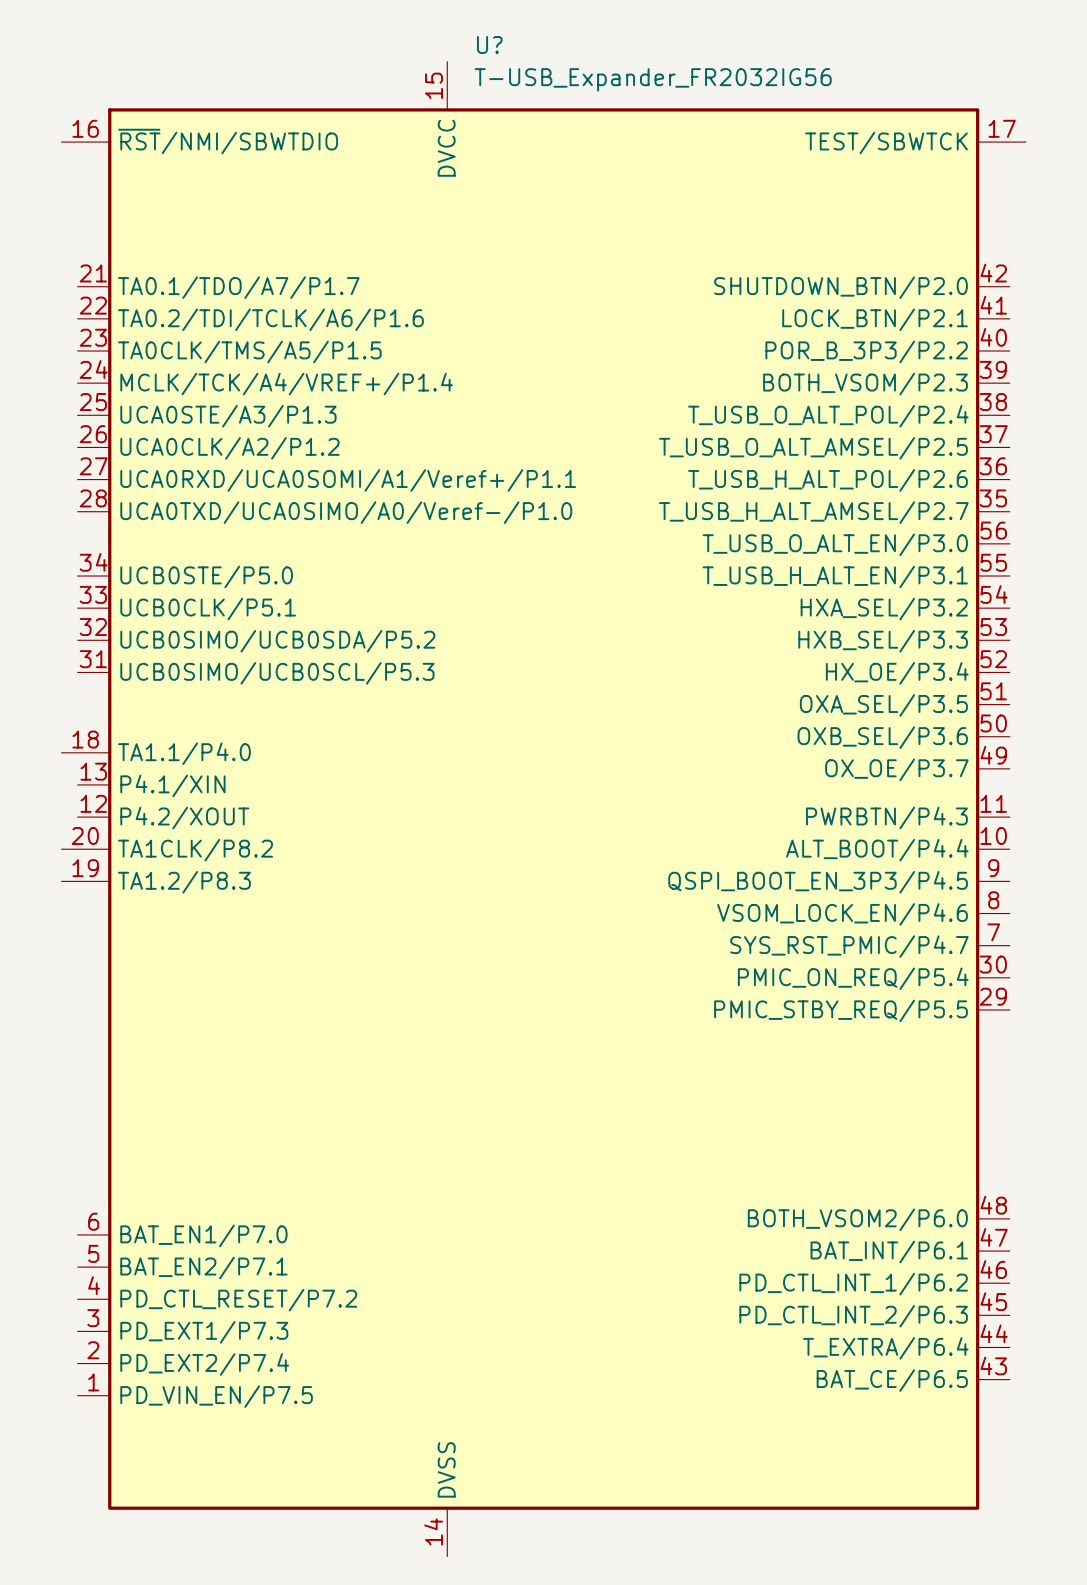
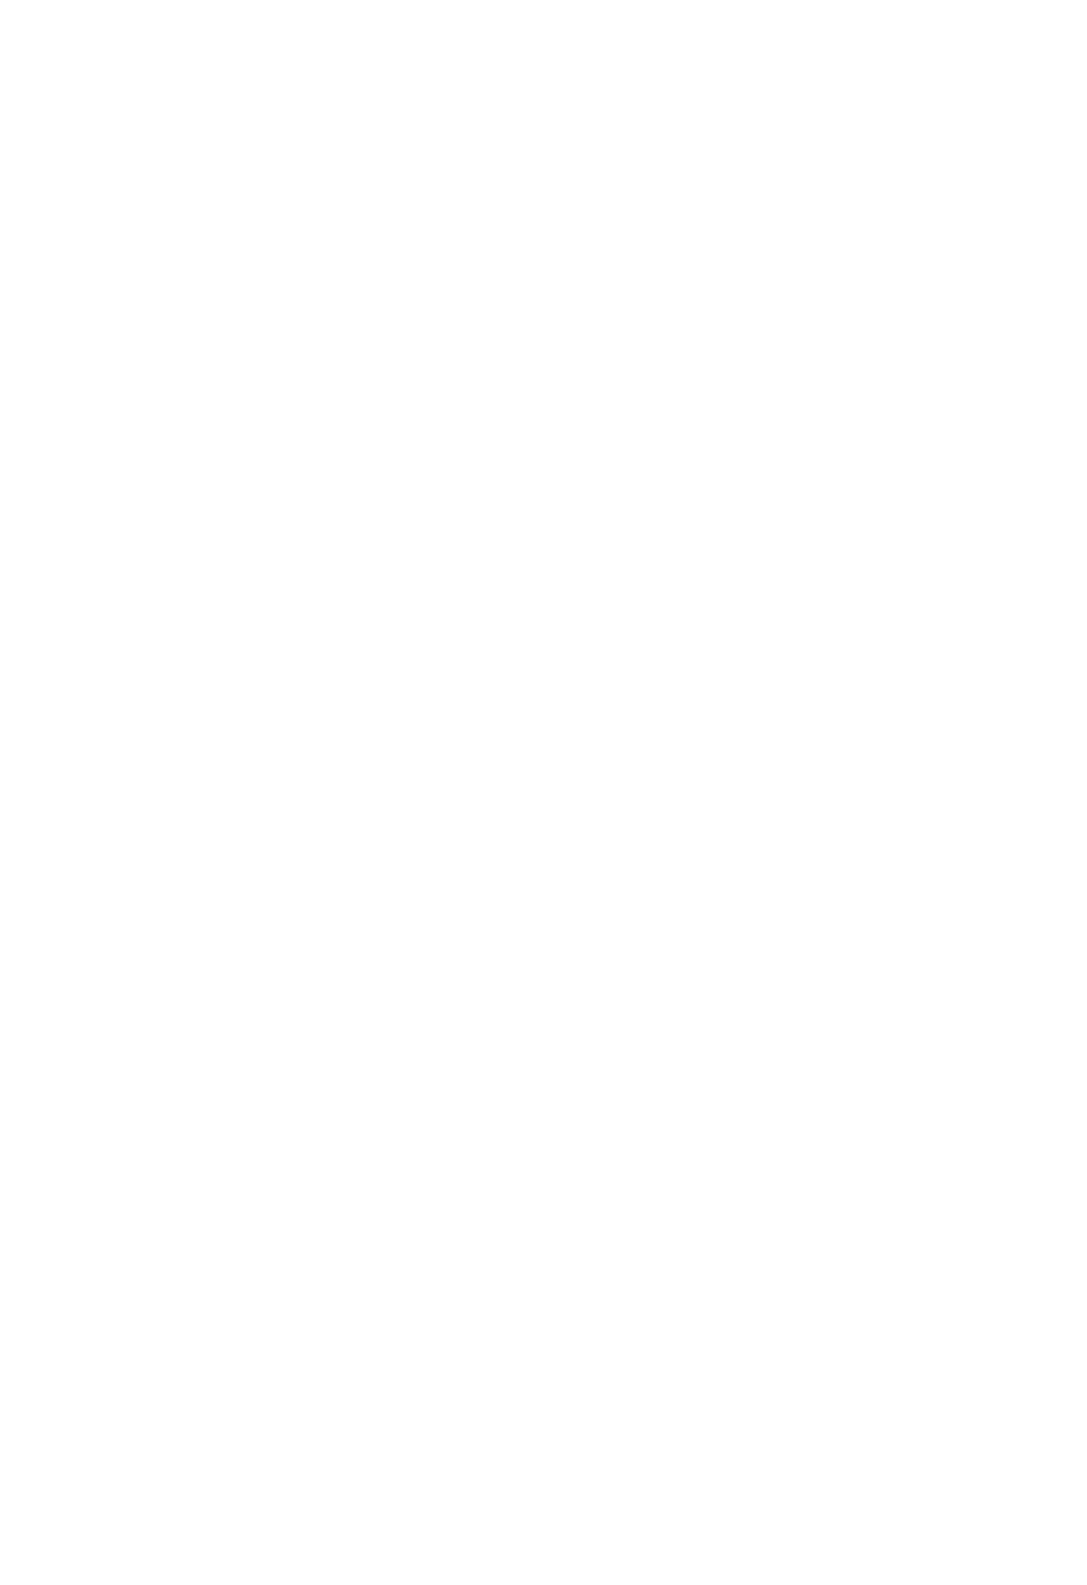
U?: T-USB_Expander_FR2032IG56 (543, 809) -> none

